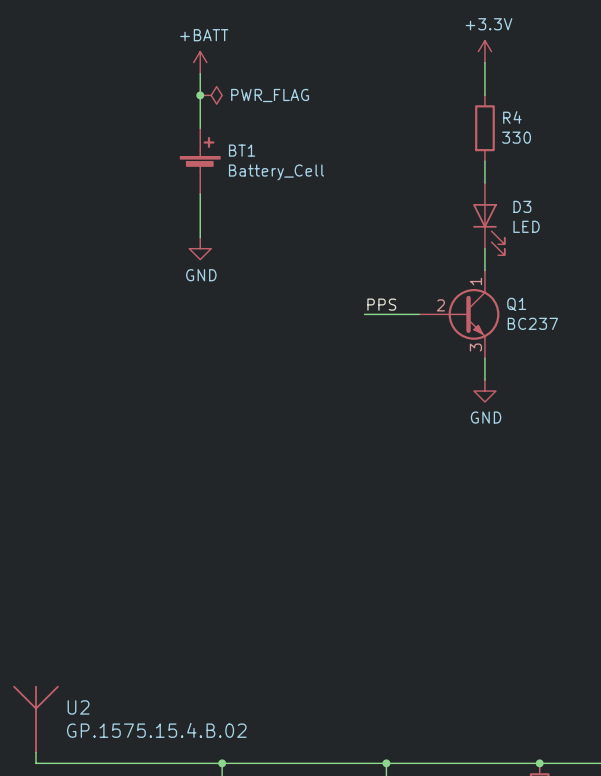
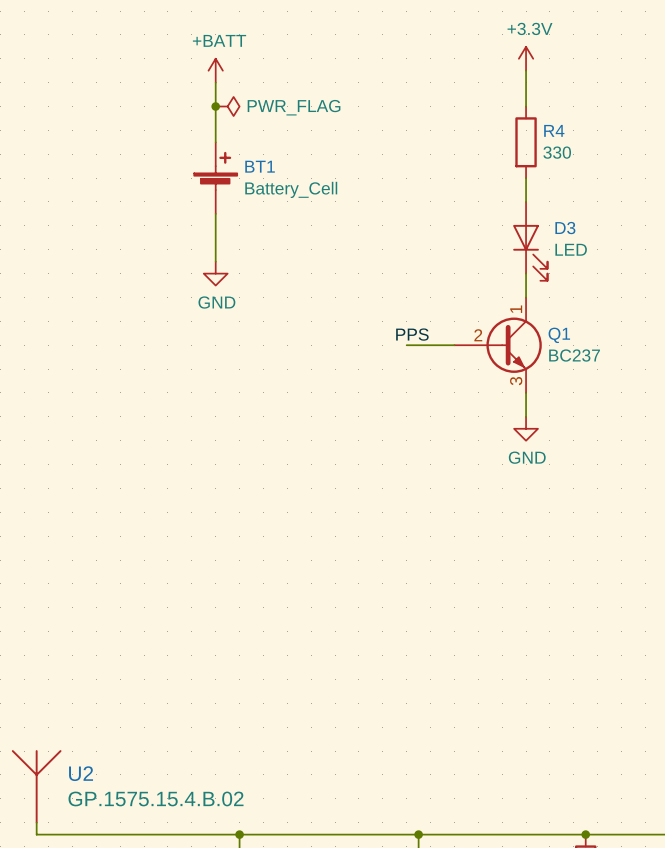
wire: (364, 314) (375, 314) -> none

